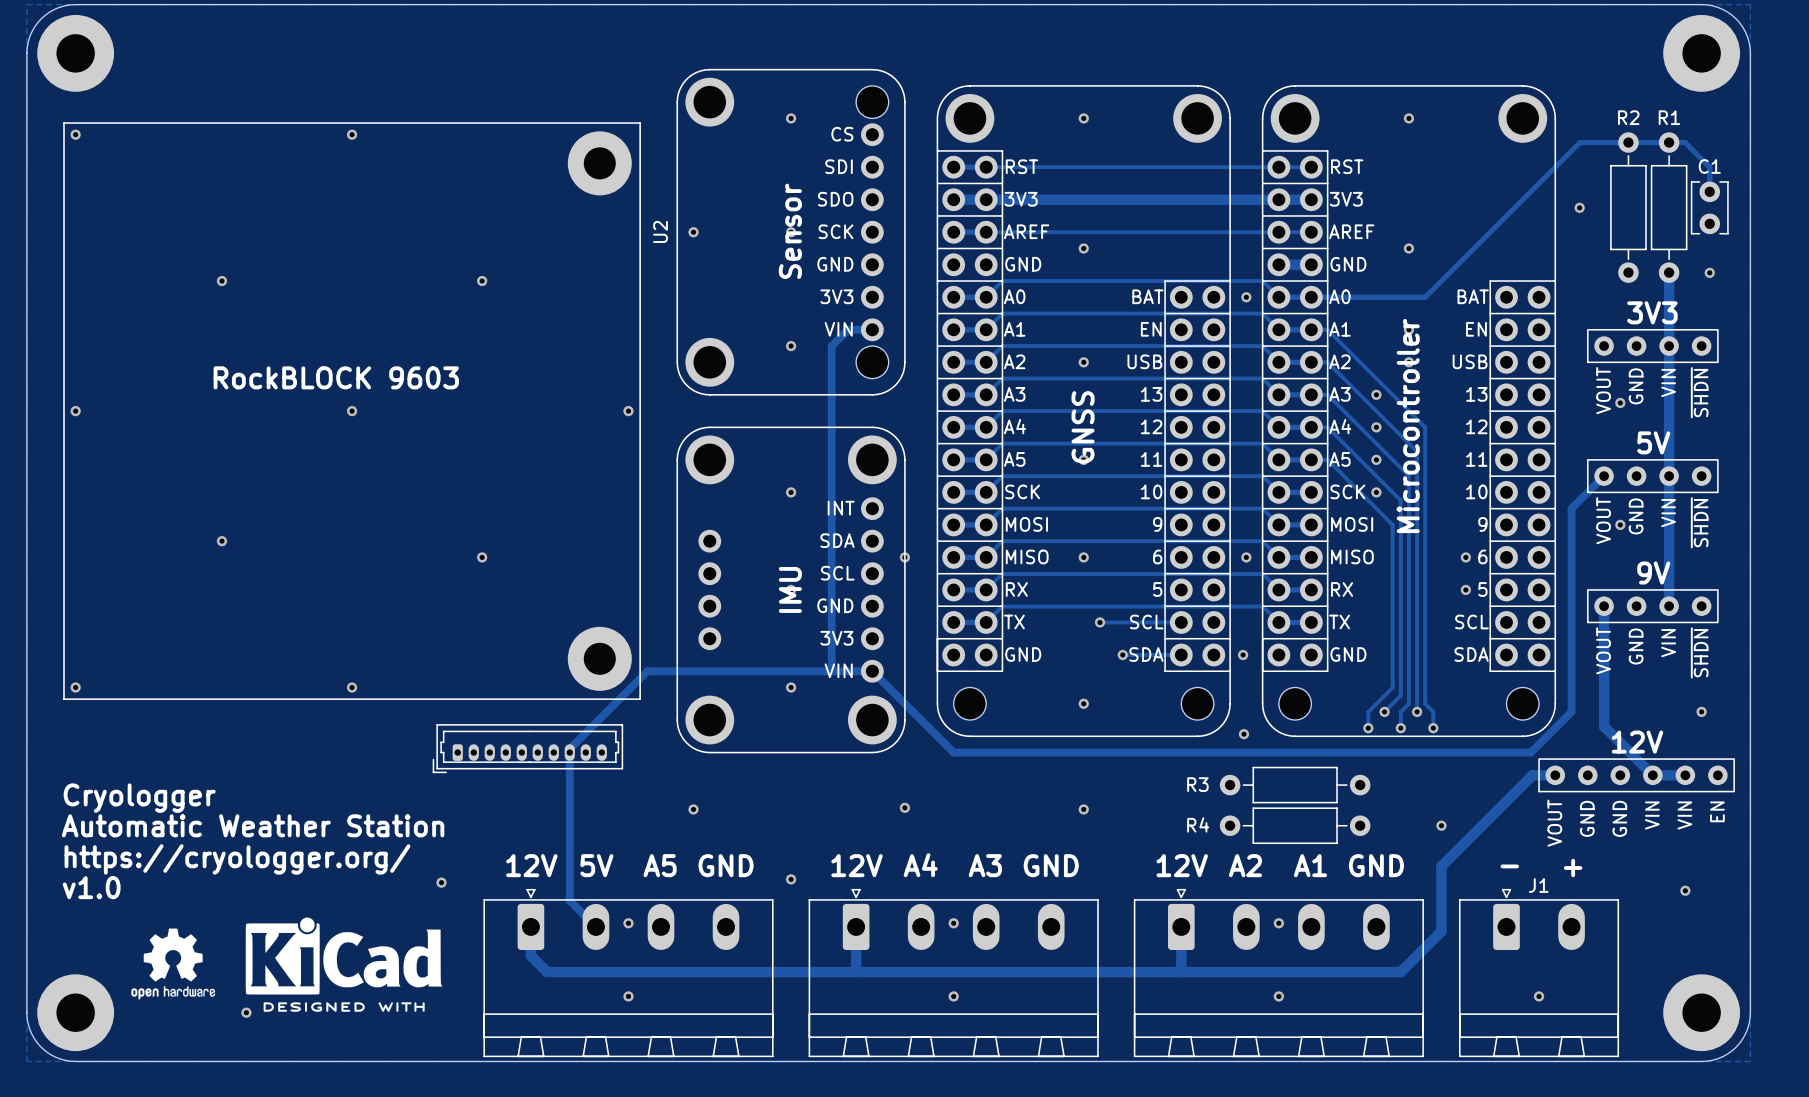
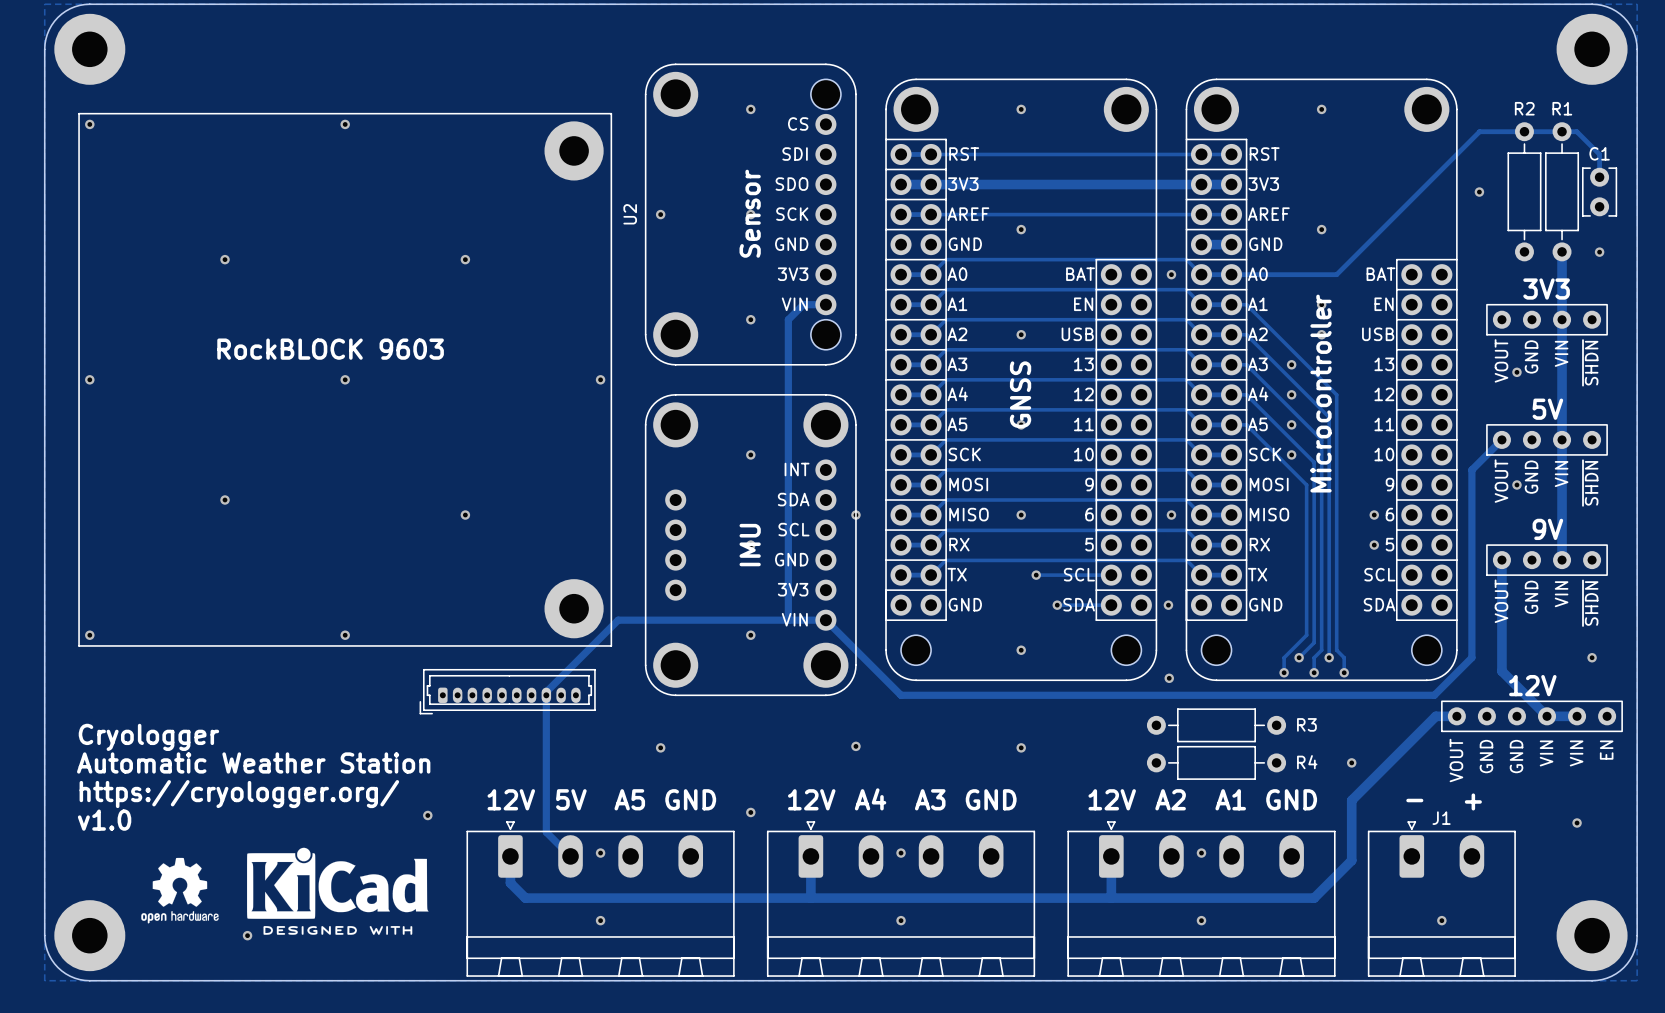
R3 name position: R3 (1197, 784) -> R3 (1306, 724)
R4 name position: R4 (1198, 824) -> R4 (1307, 762)

